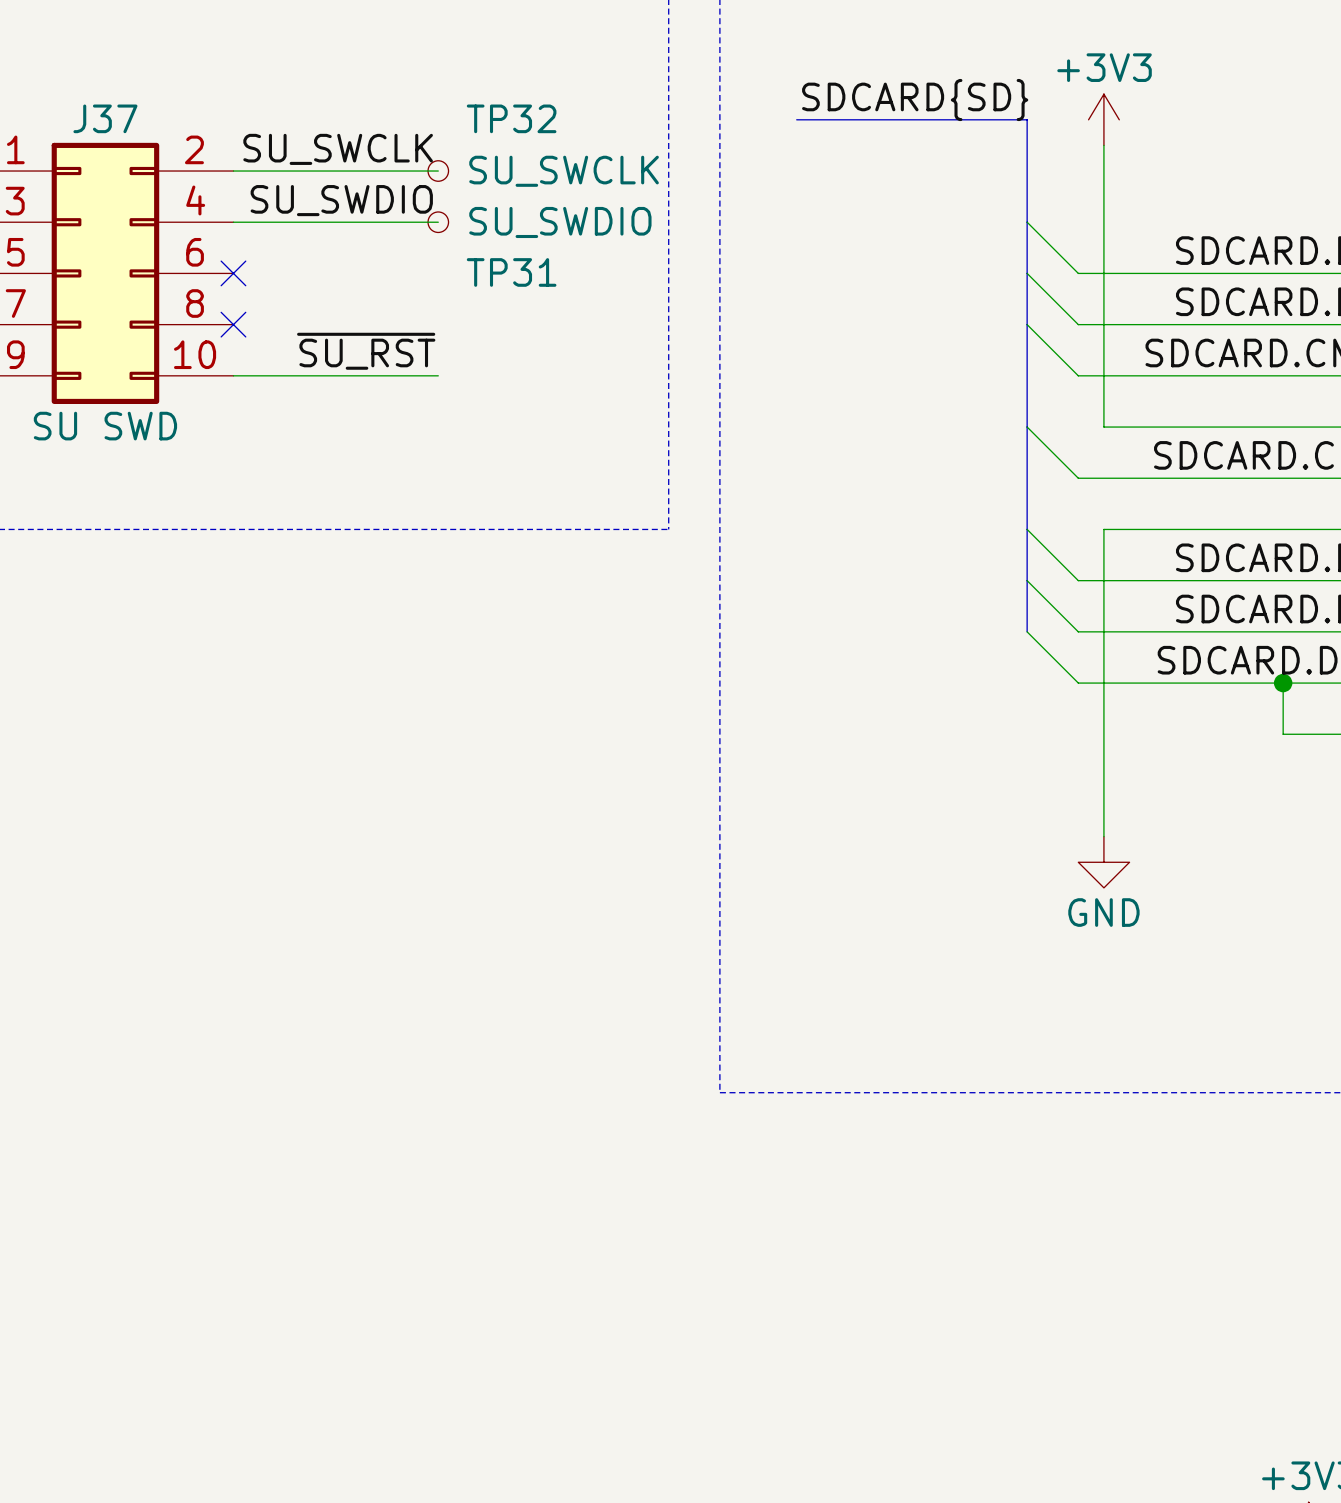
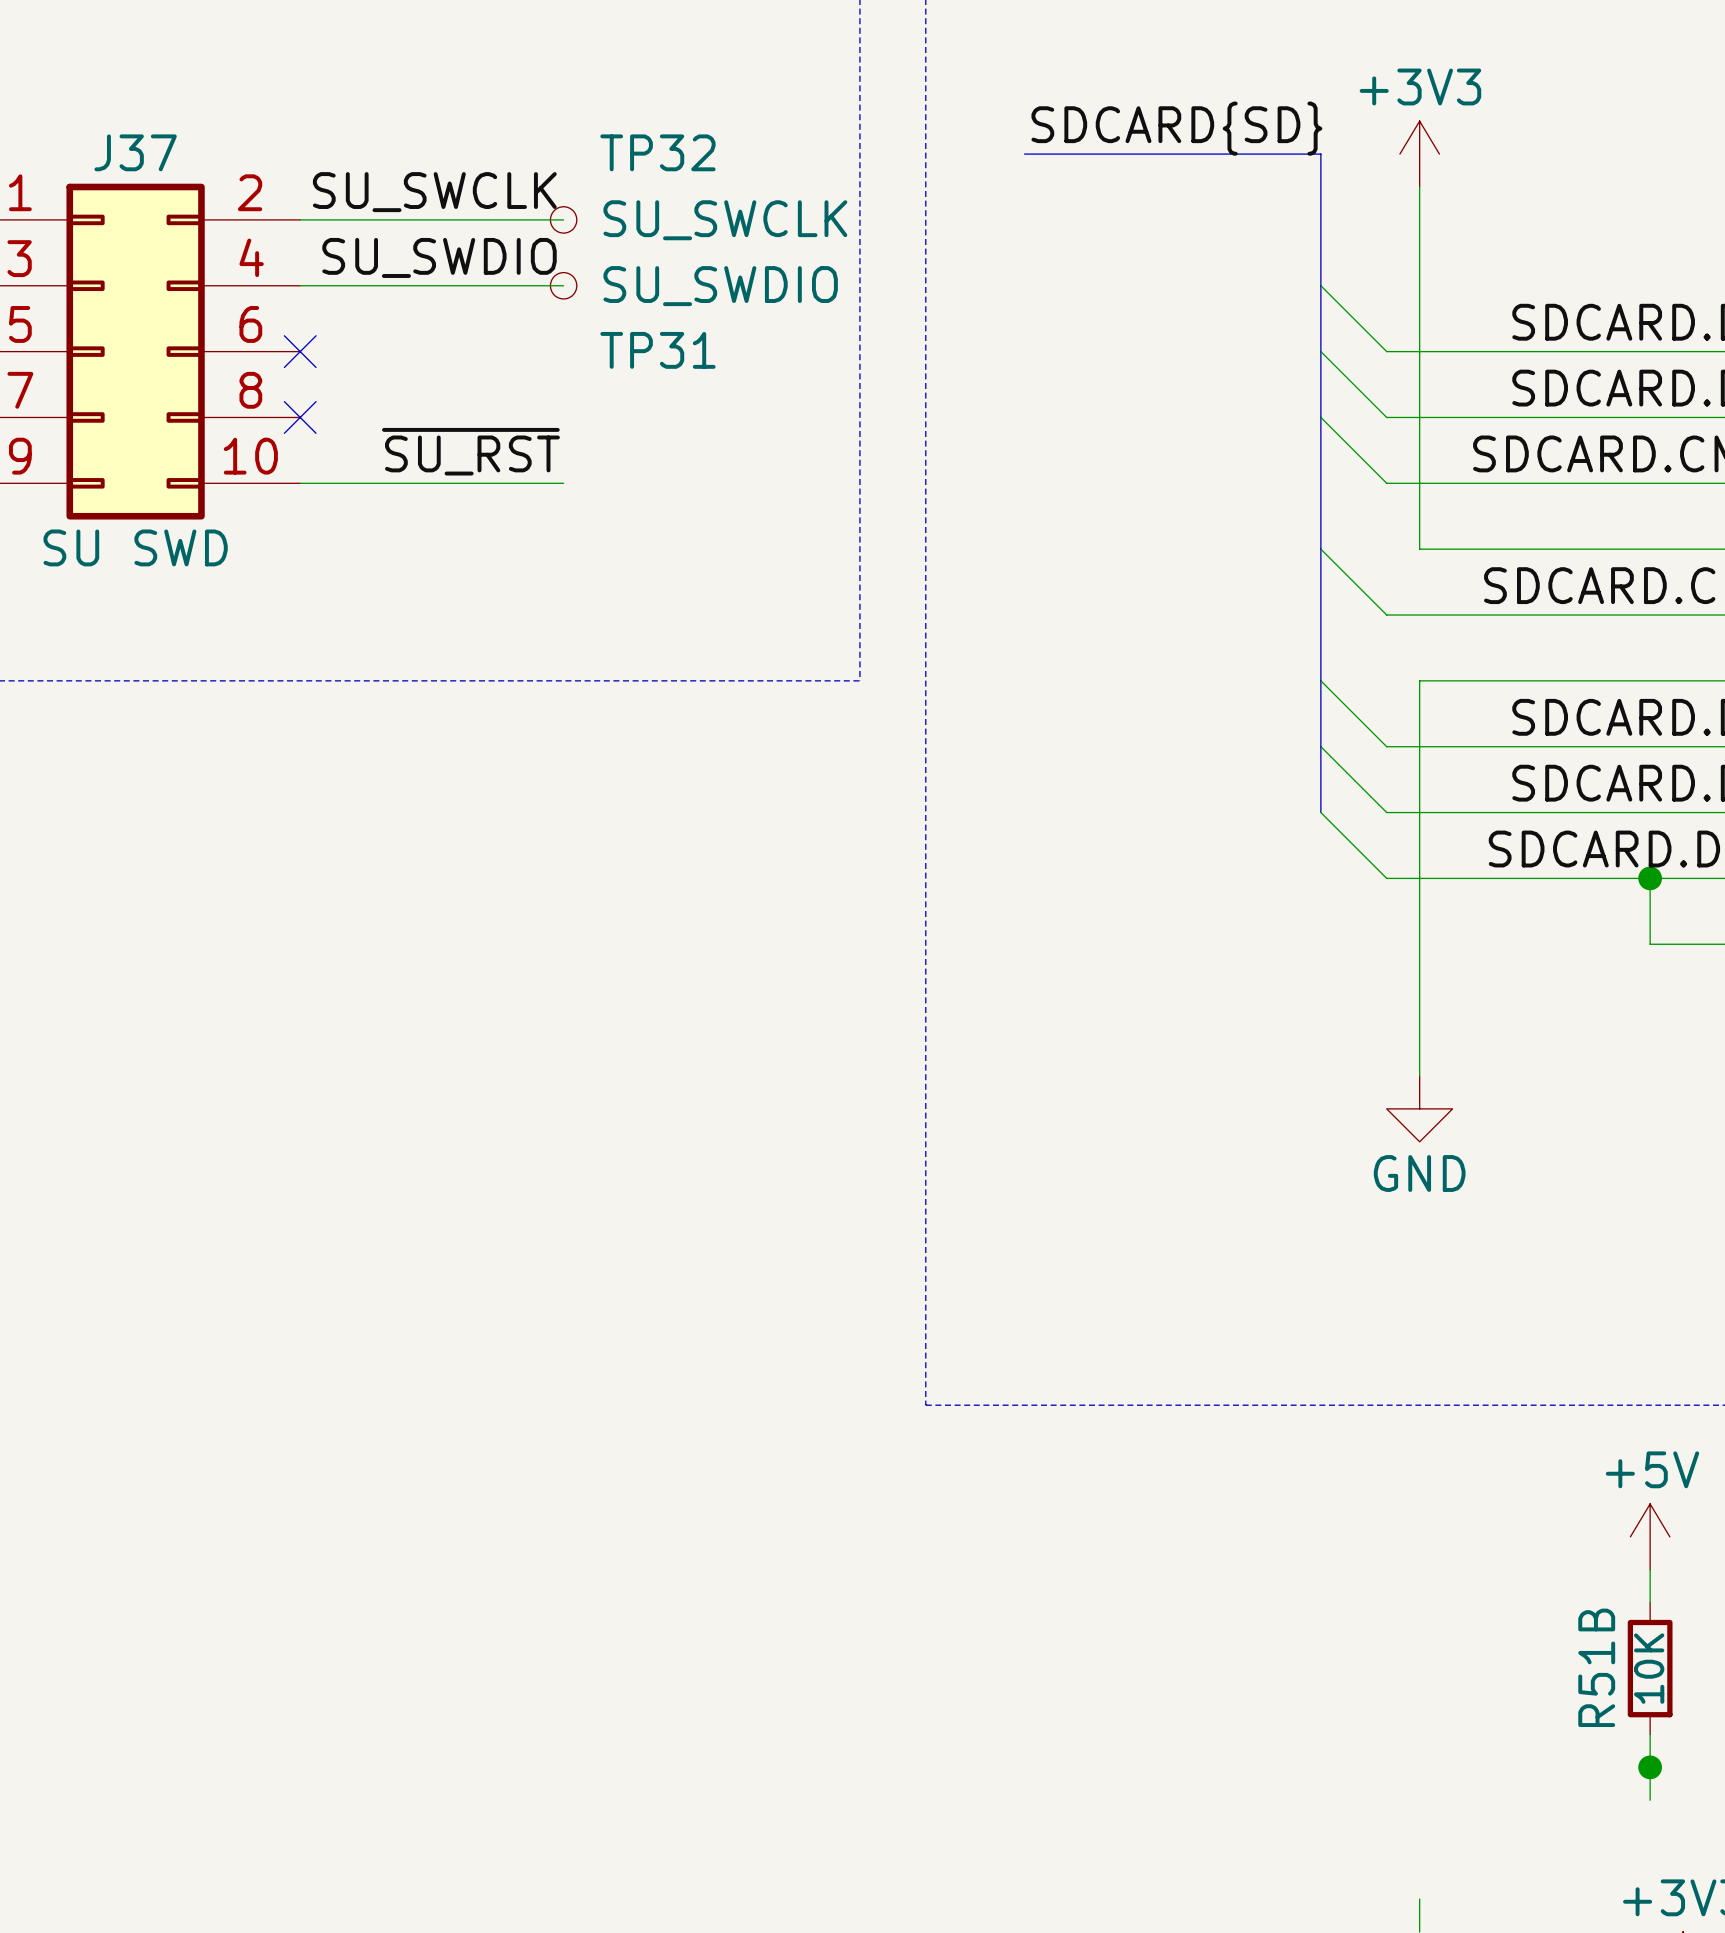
power symbol: none -> +5V (1650, 1536)
wire: none -> (1650, 1569) (1650, 1602)
R51B: none -> 10K (1650, 1668)
wire: none -> (1650, 1734) (1650, 1800)
junction: none -> (1650, 1767)
wire: none -> (1419, 1899) (1419, 1931)

